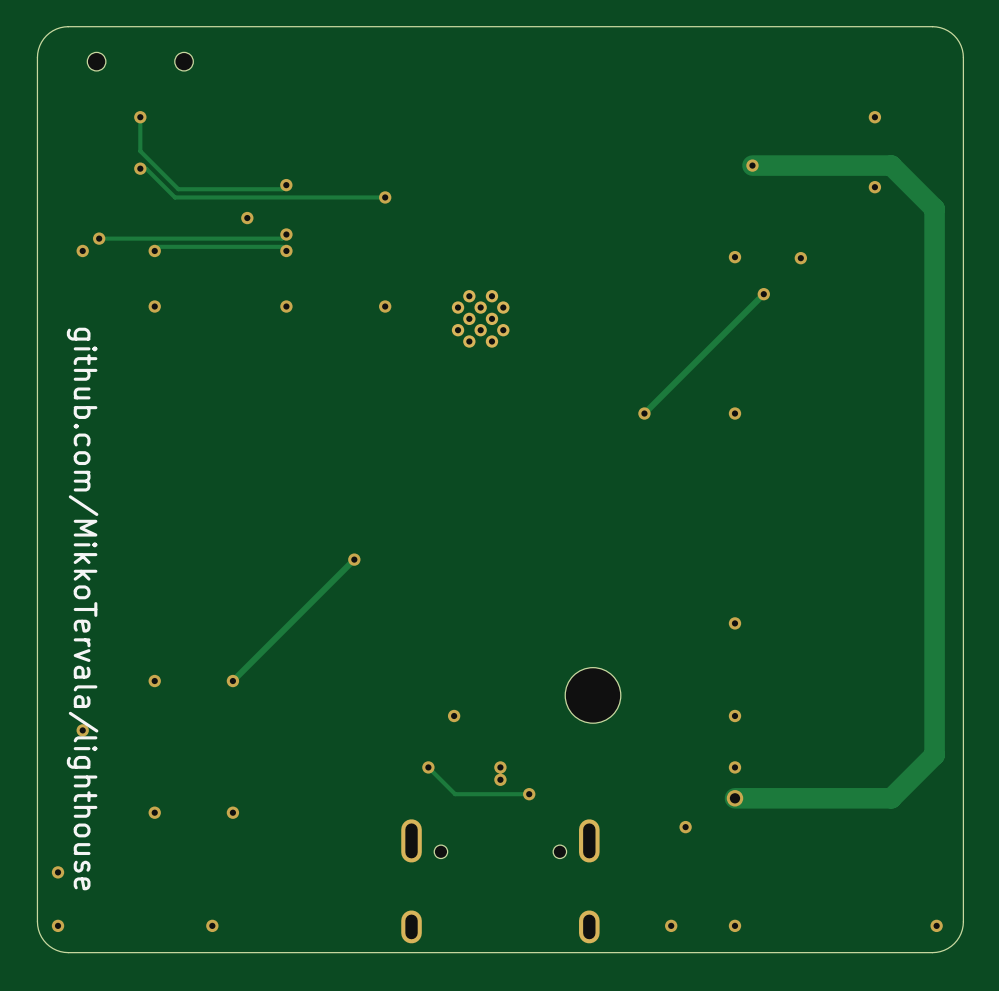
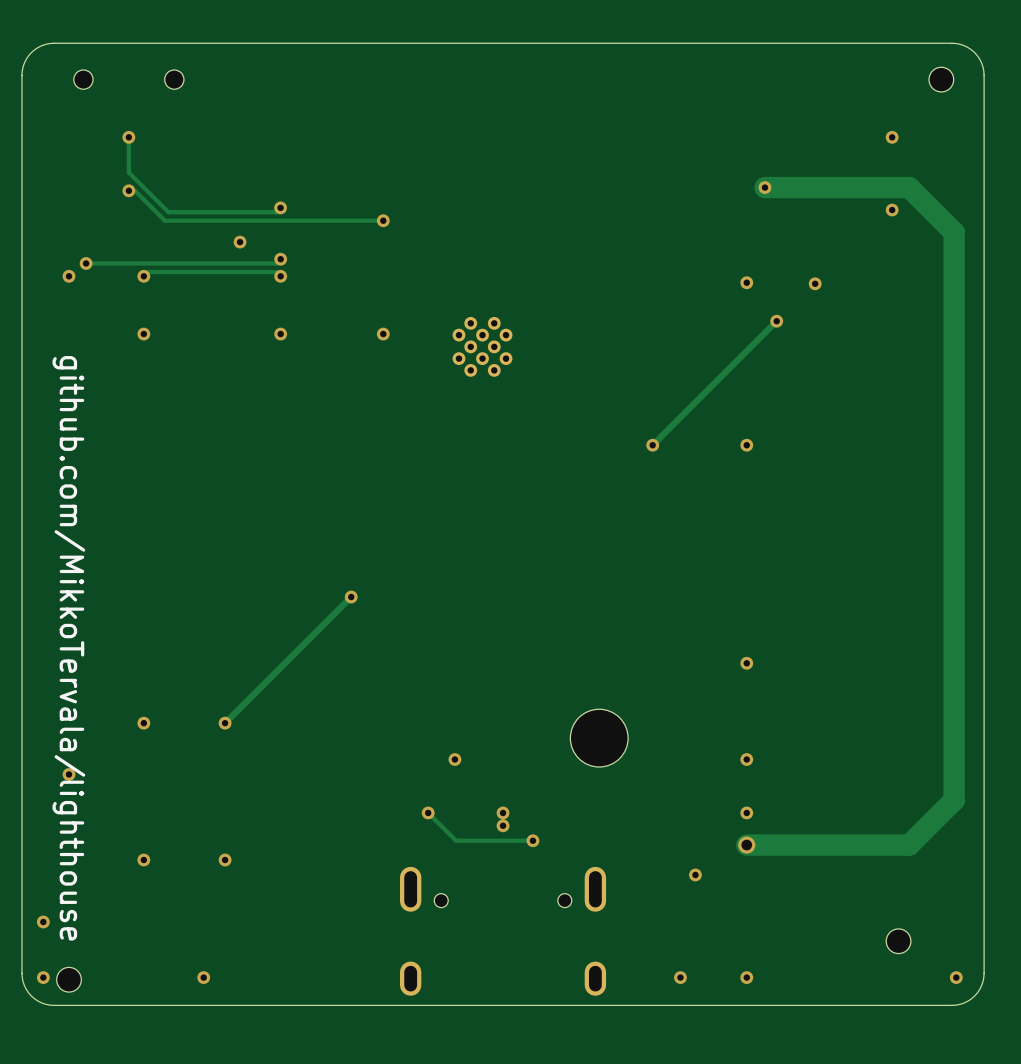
part: none -> (941, 79)
part: none -> (898, 941)
part: none -> (69, 979)

